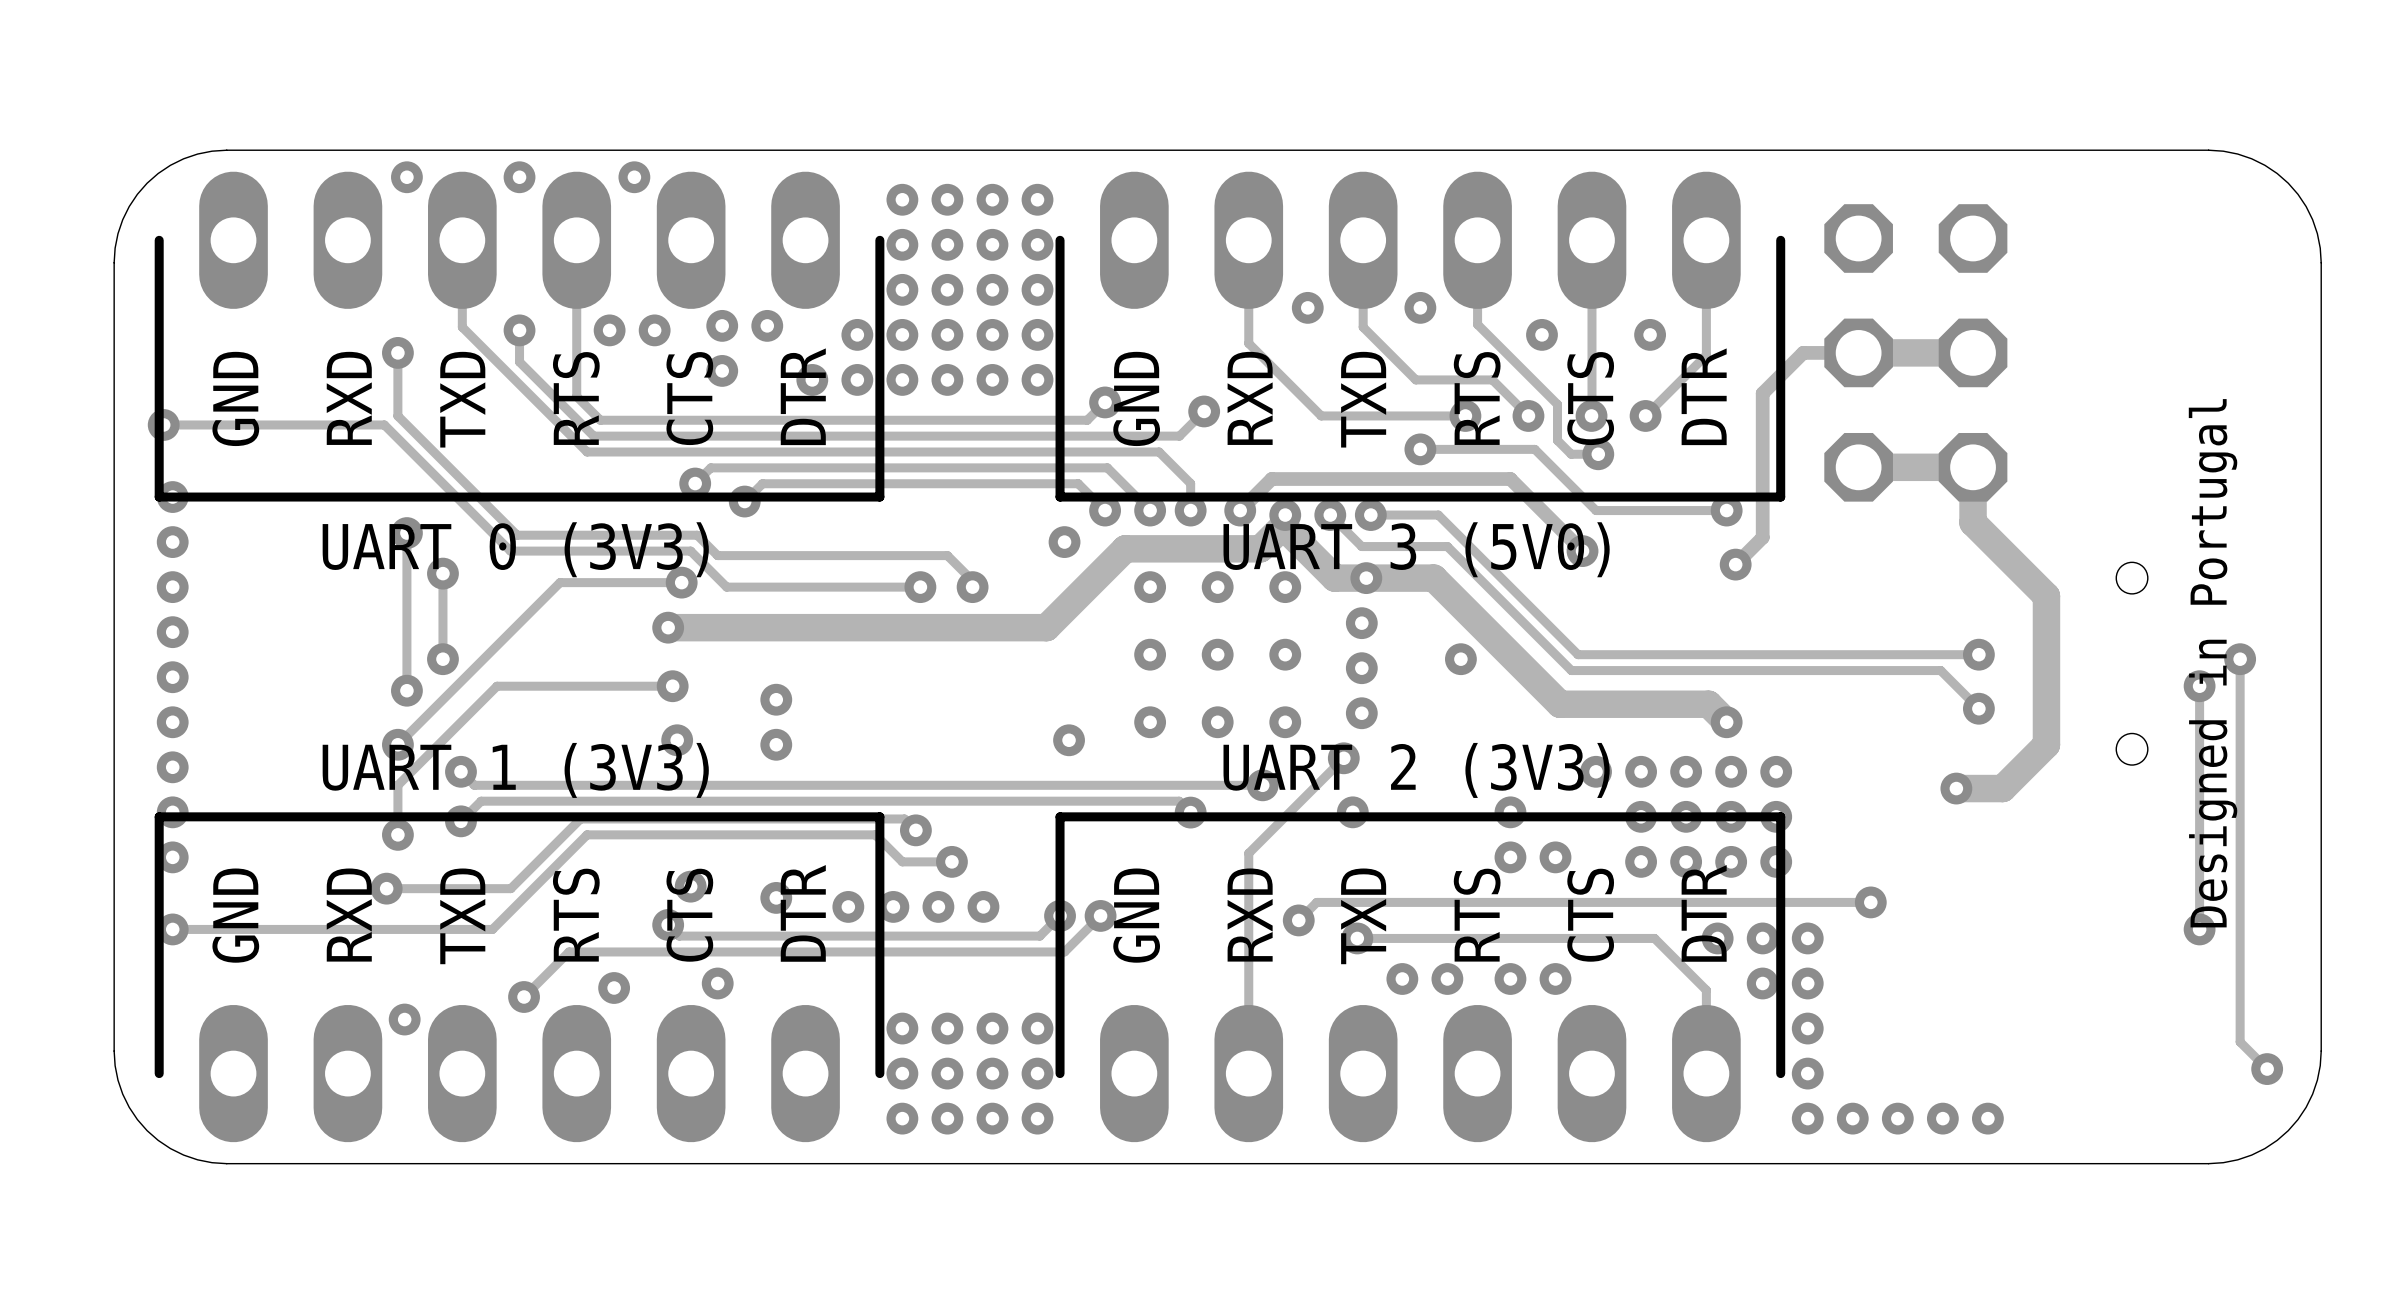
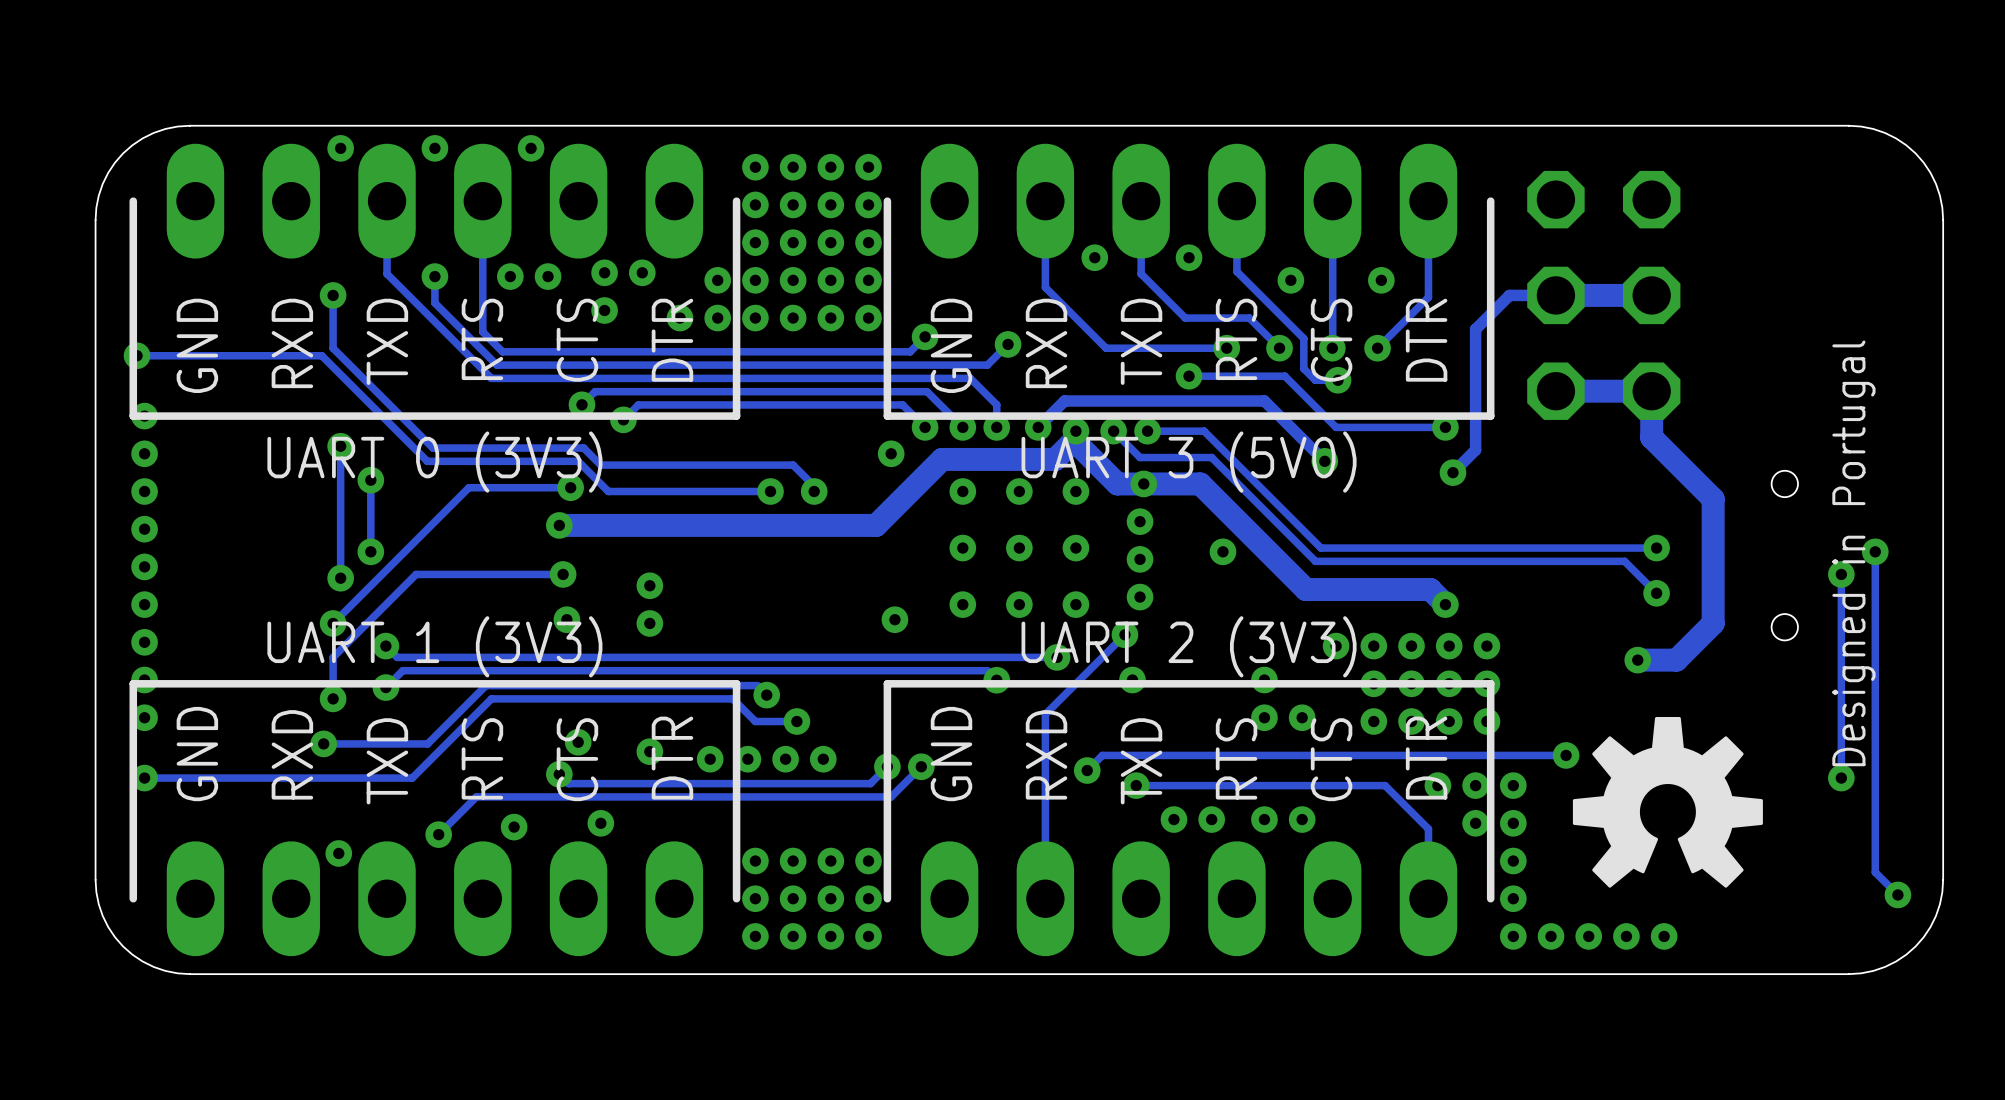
drawing: none -> [1572, 717, 1763, 888]

